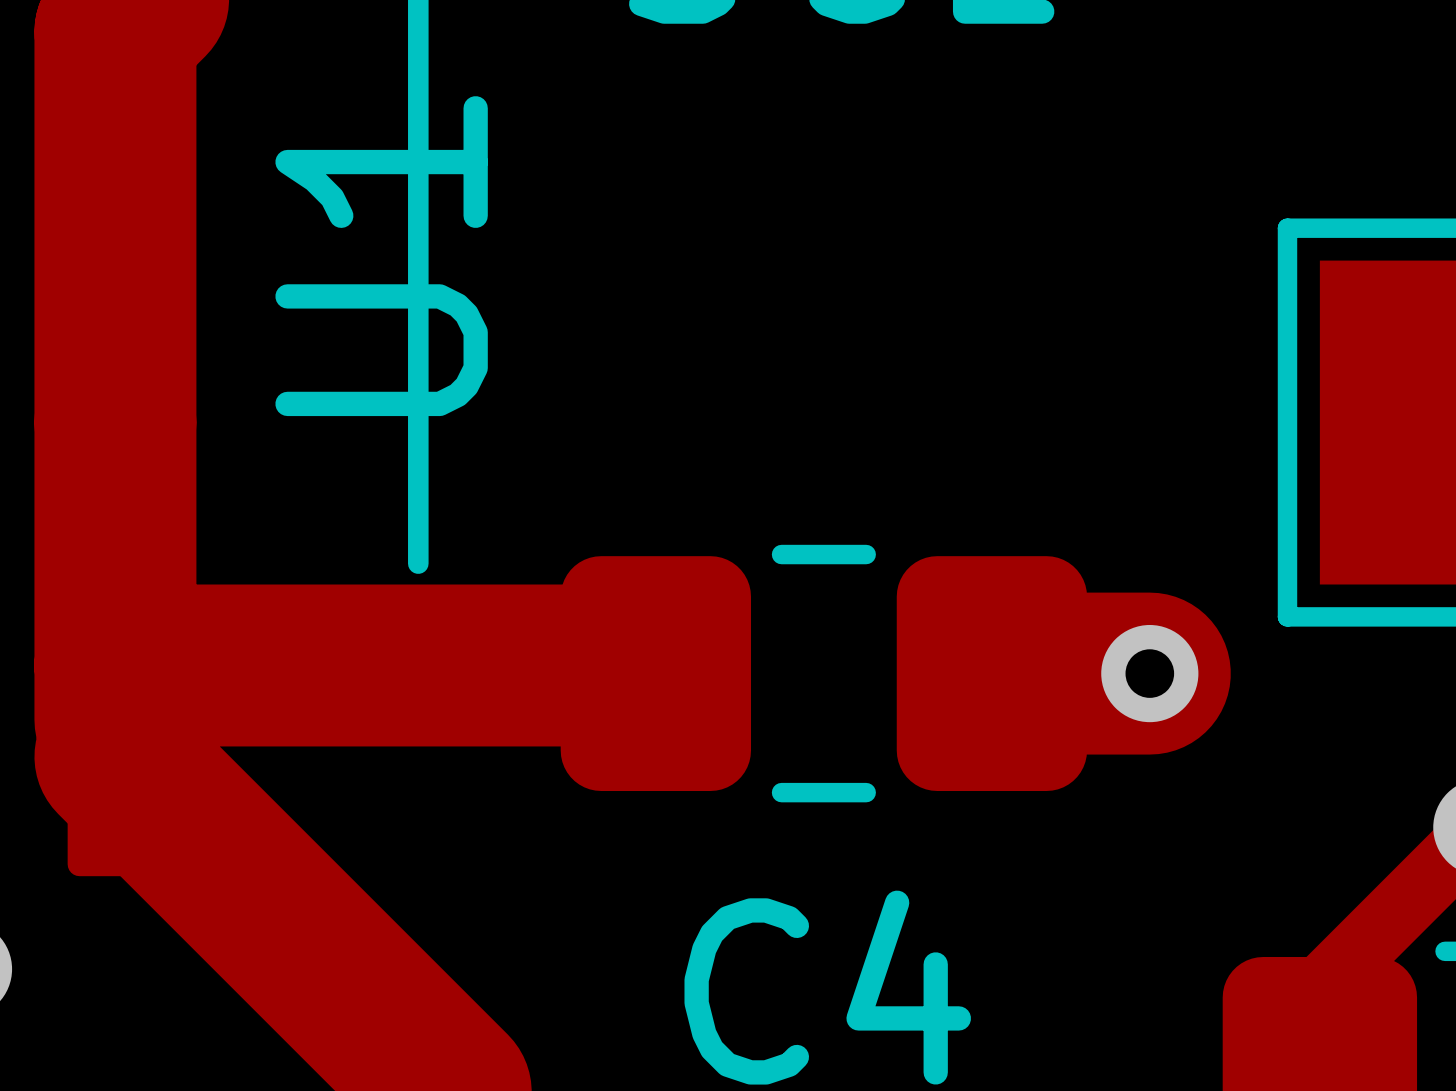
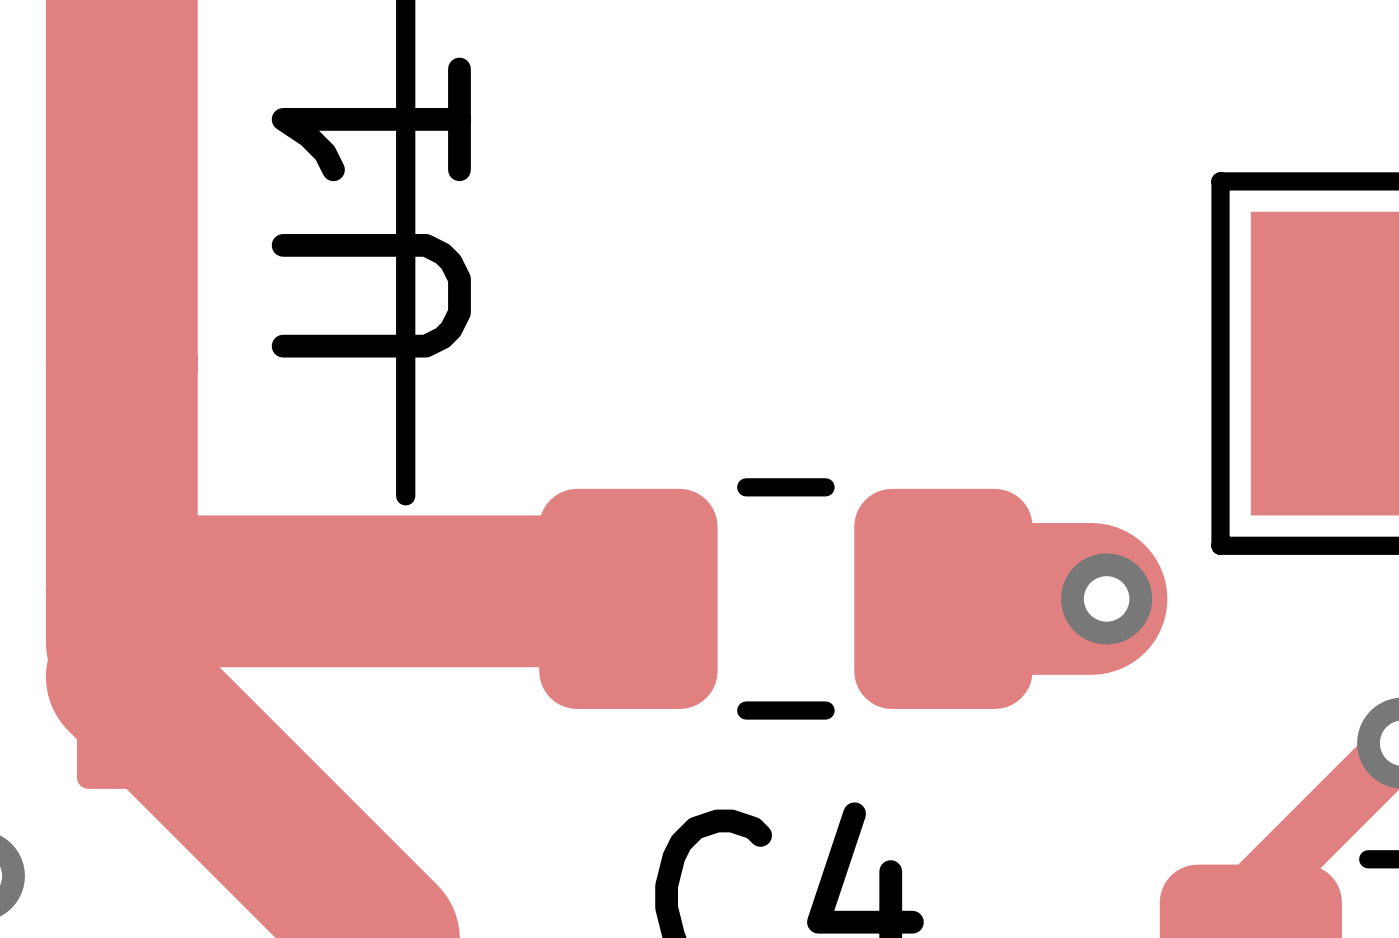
via position: (1149, 673) -> (1106, 598)

